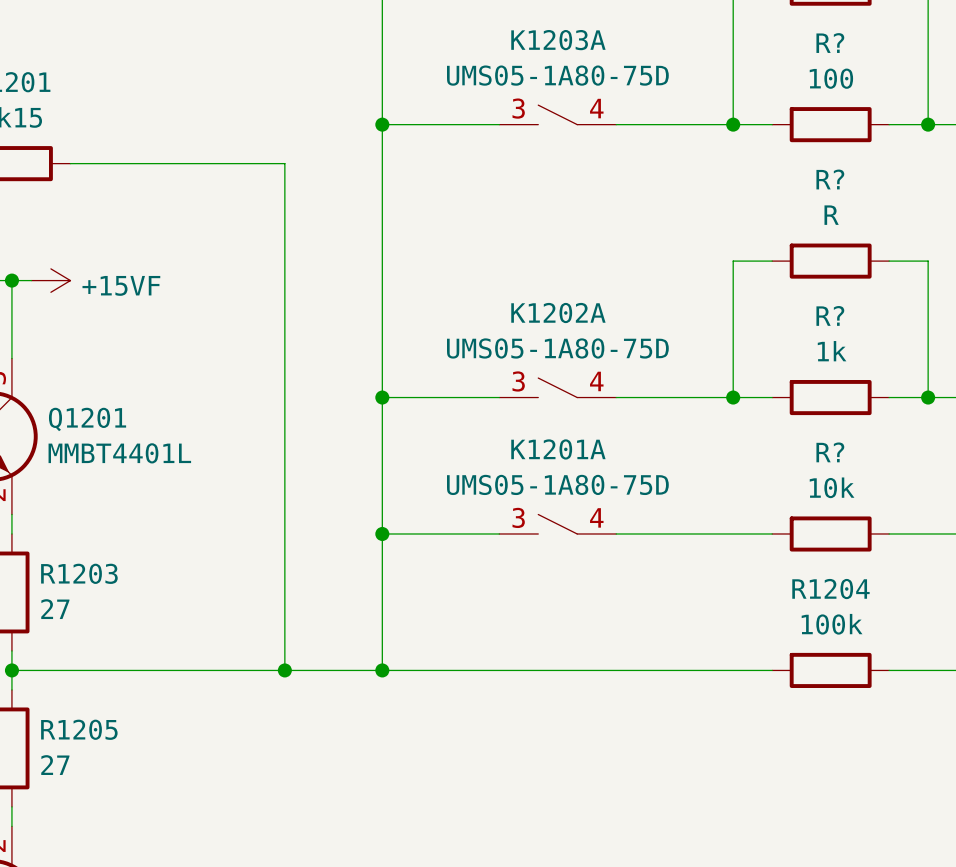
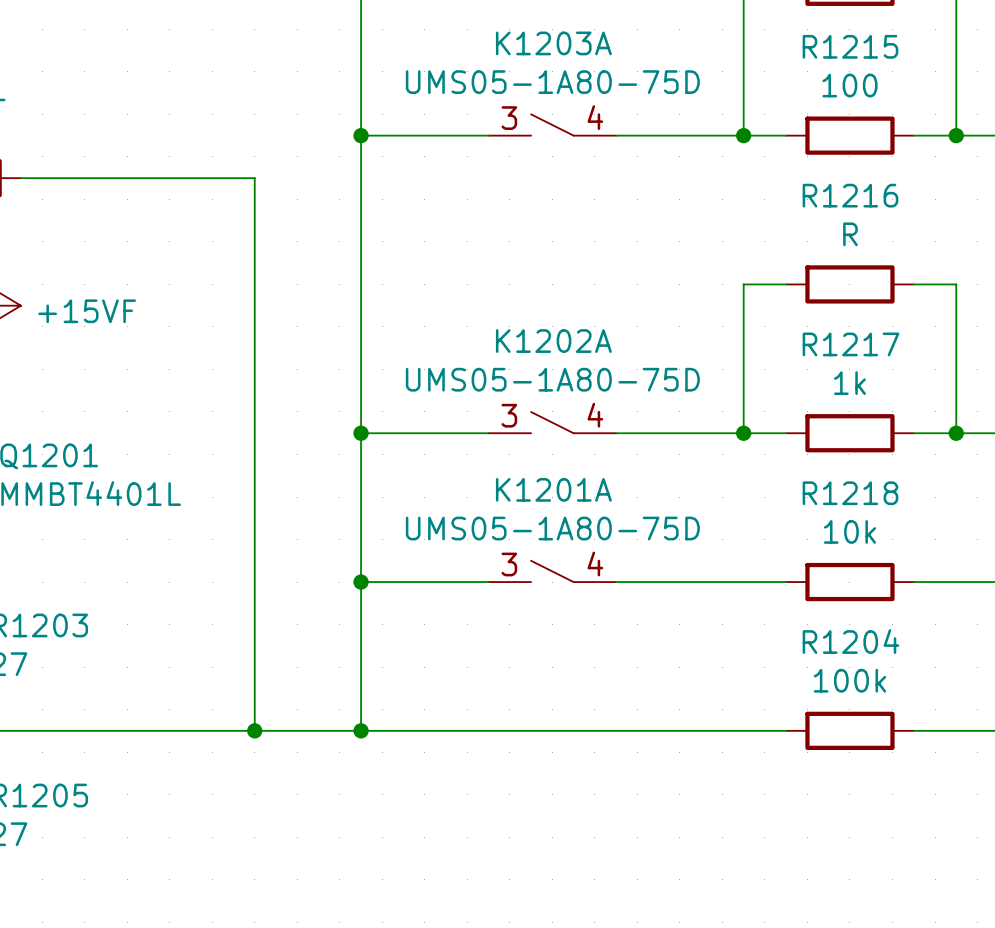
R? name: R? (830, 43) -> R1215 (850, 46)
R? name: R? (830, 179) -> R1216 (850, 195)
R? name: R? (830, 315) -> R1217 (850, 344)
R? name: R? (830, 452) -> R1218 (850, 493)

